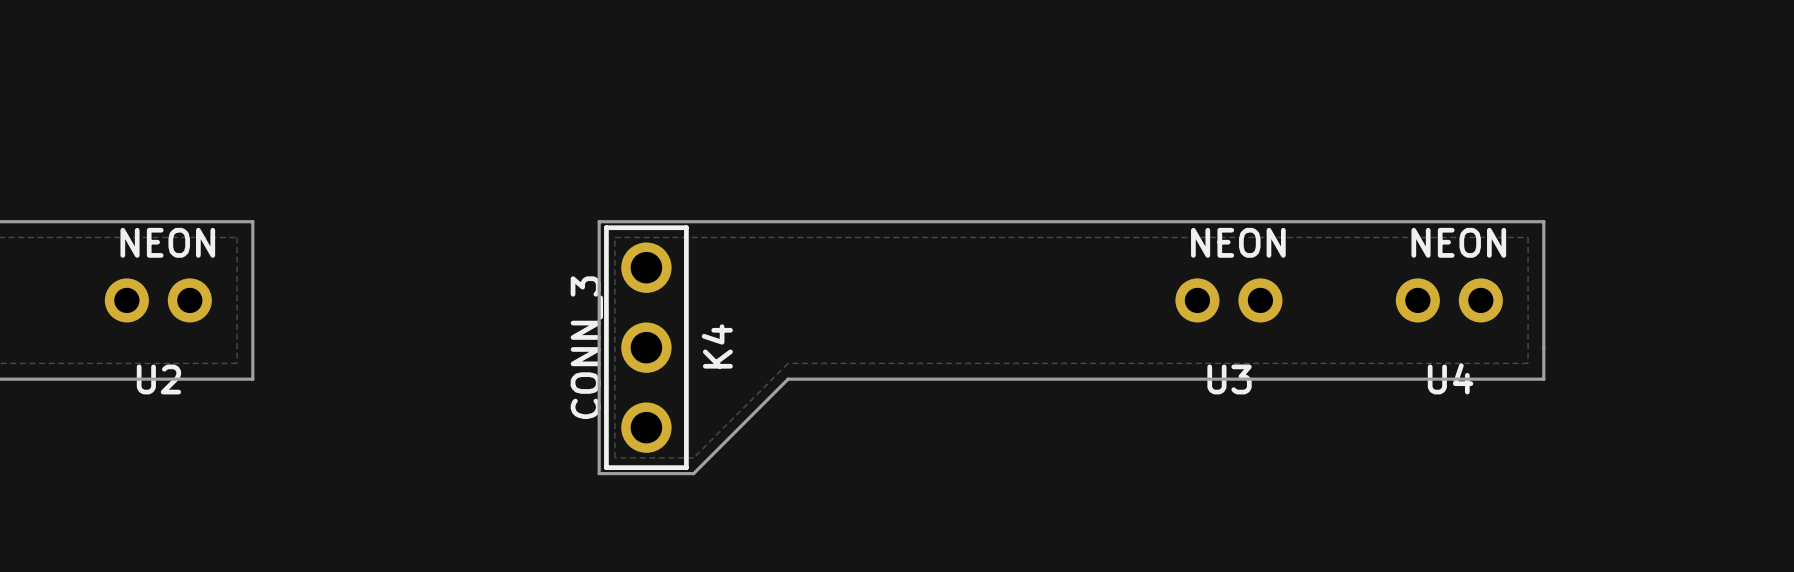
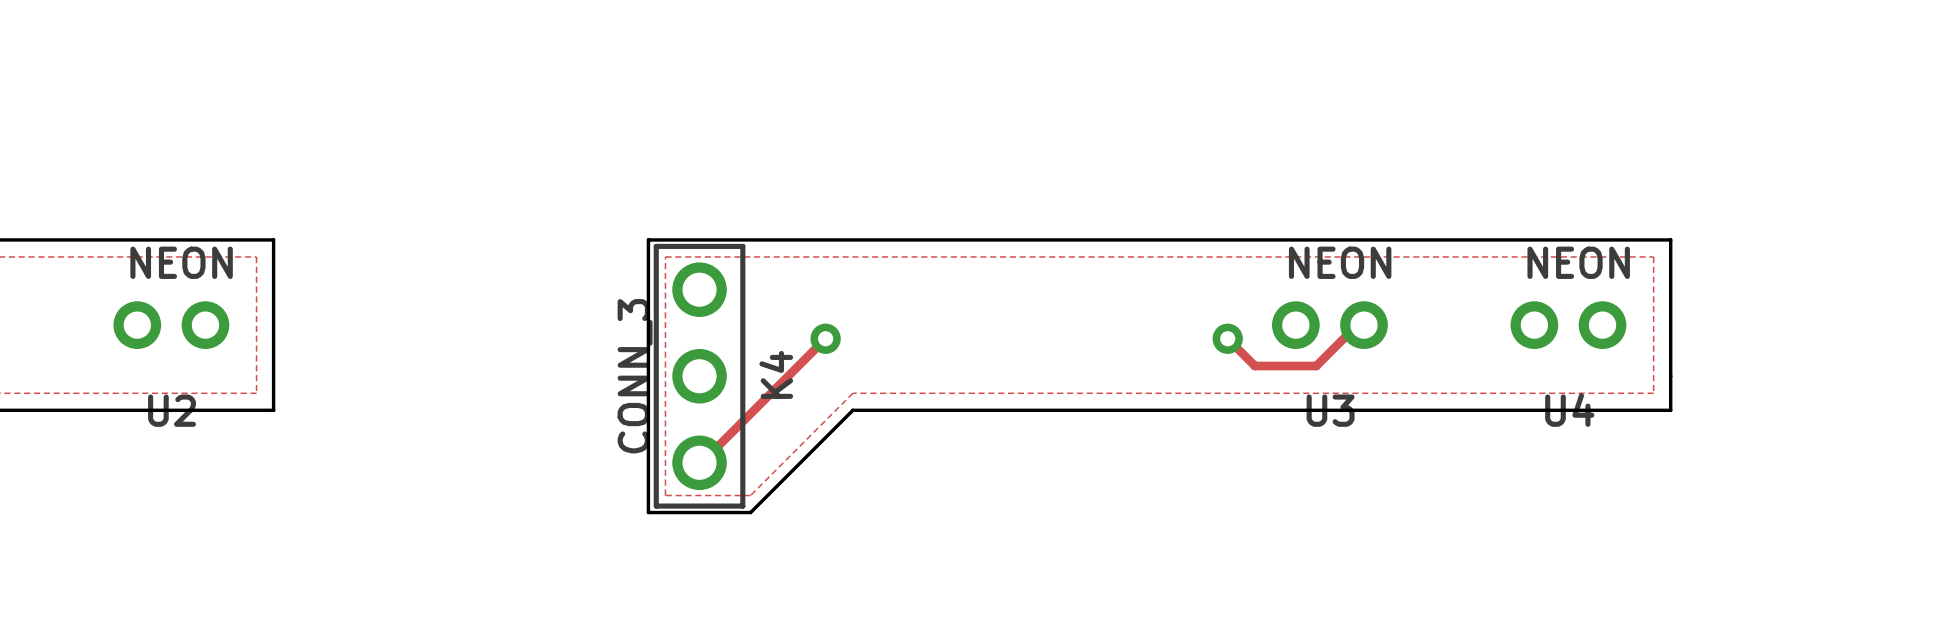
track: none -> (1364, 325) (1357, 325) (1316, 366) (1254, 366) (1227, 338)
track: none -> (825, 338) (699, 462)
via: none -> (825, 338)
via: none -> (1227, 338)

